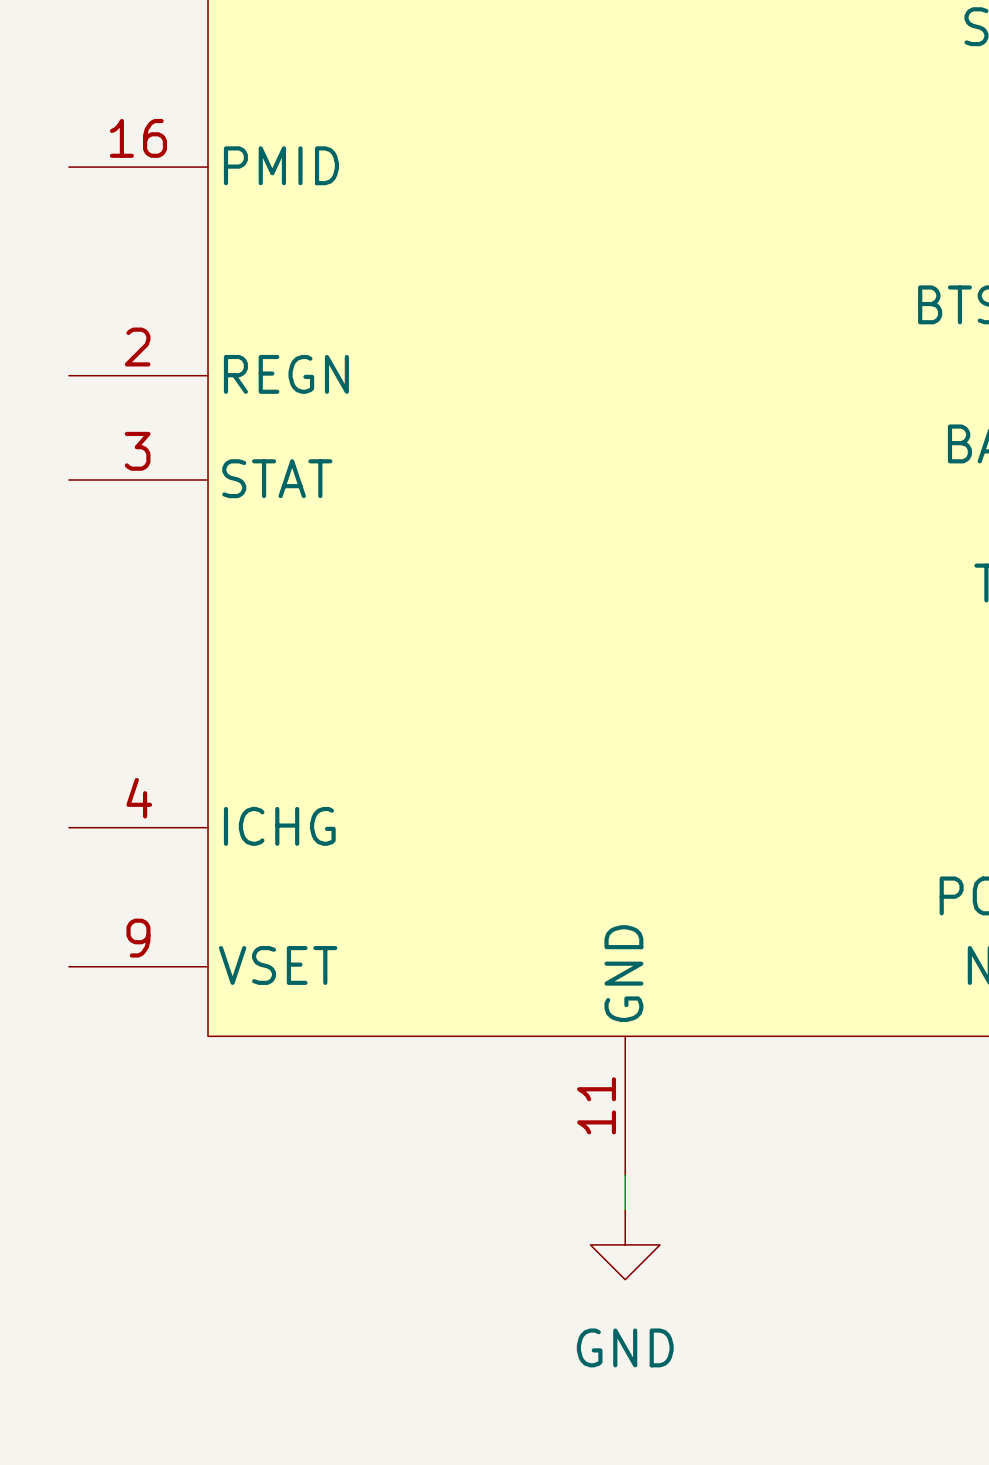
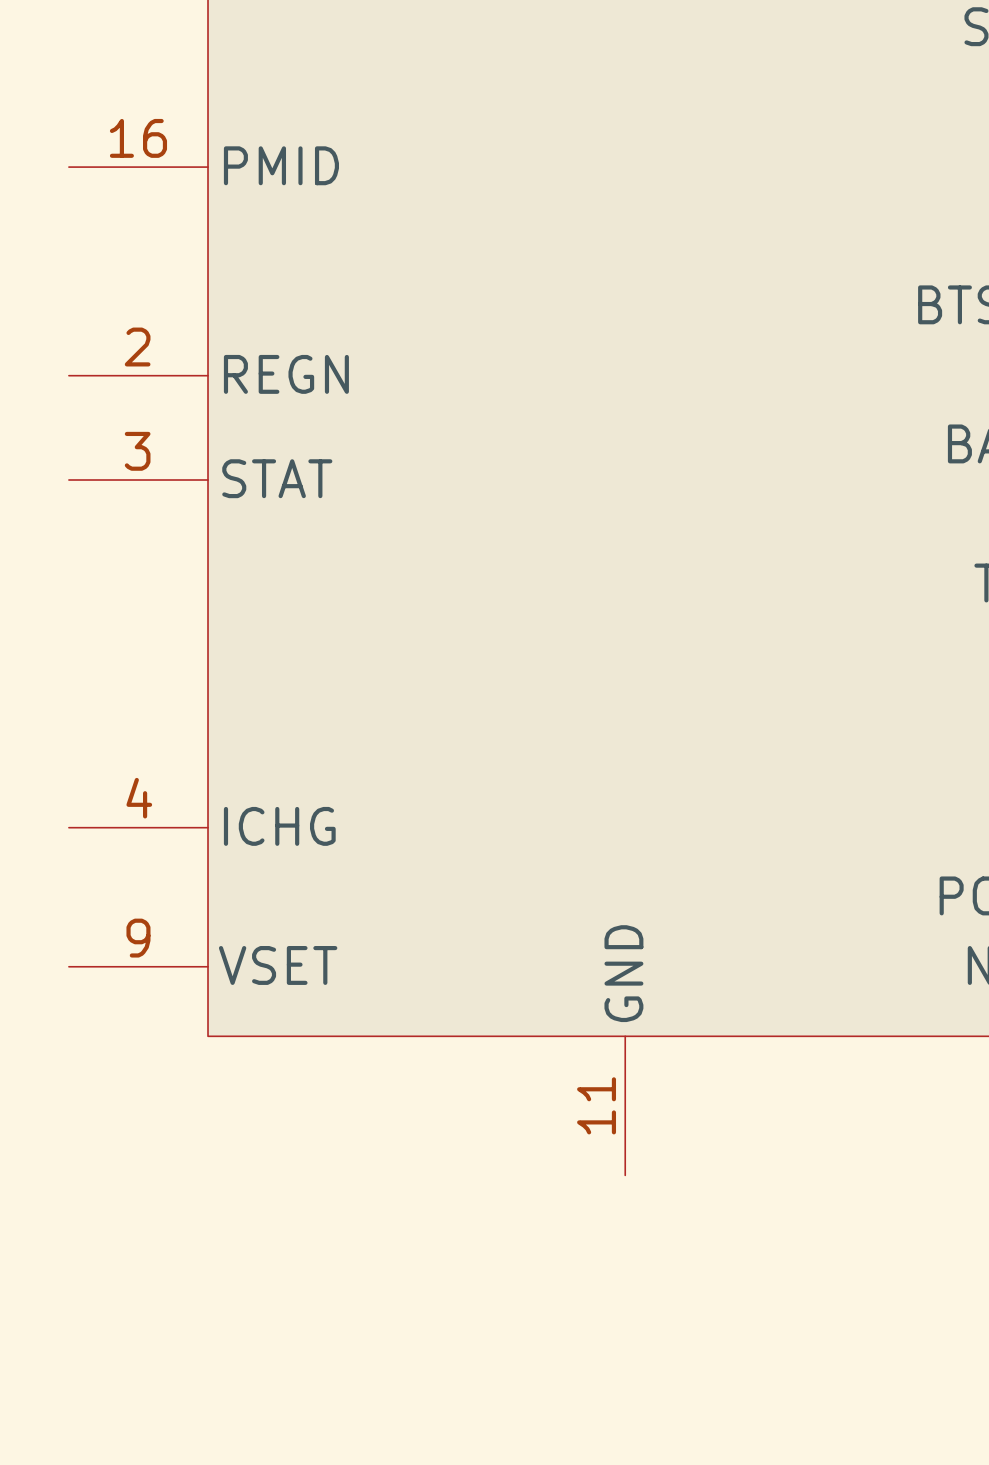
wire: (625, 1175) (625, 1210) -> none
power symbol: GND (625, 1244) -> none

